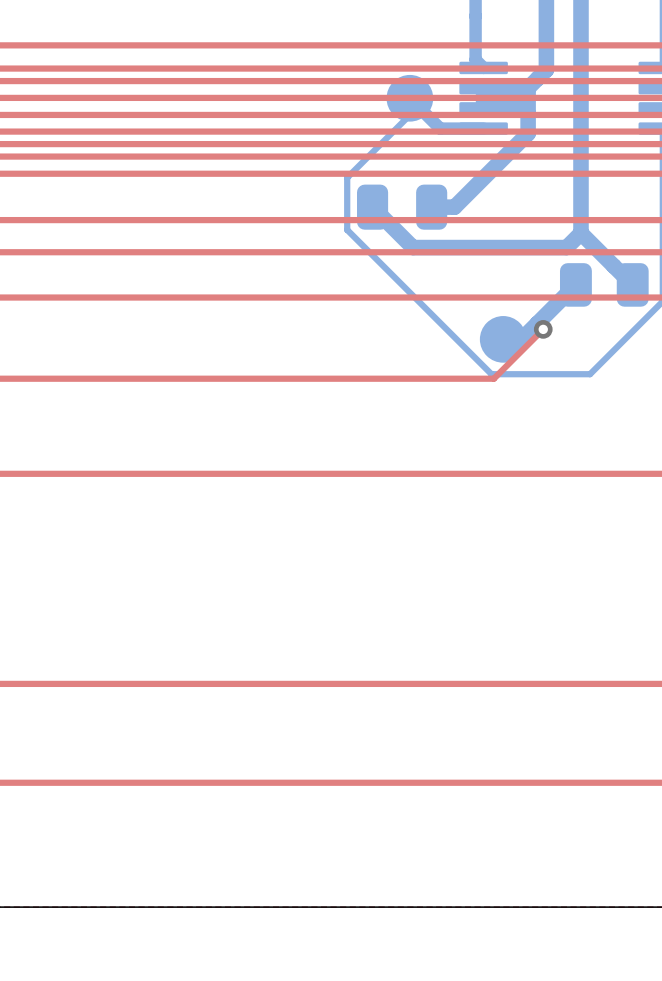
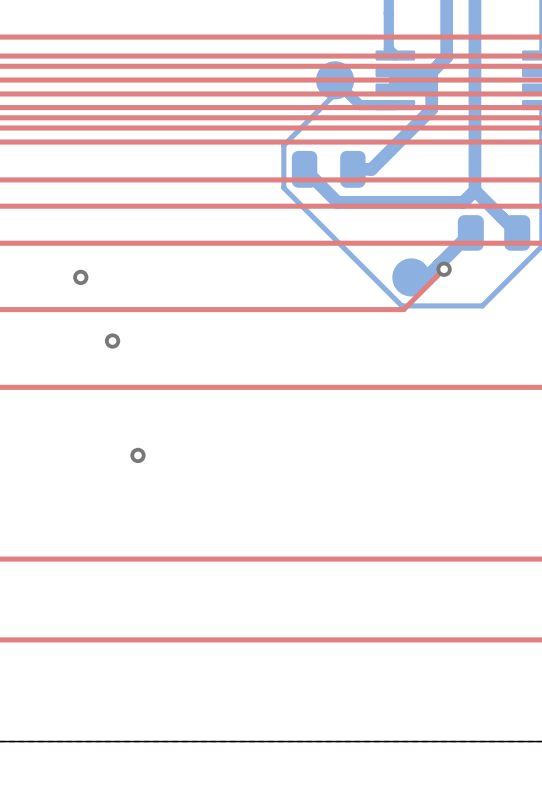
via: none -> (80, 277)
via: none -> (112, 341)
via: none -> (137, 455)

